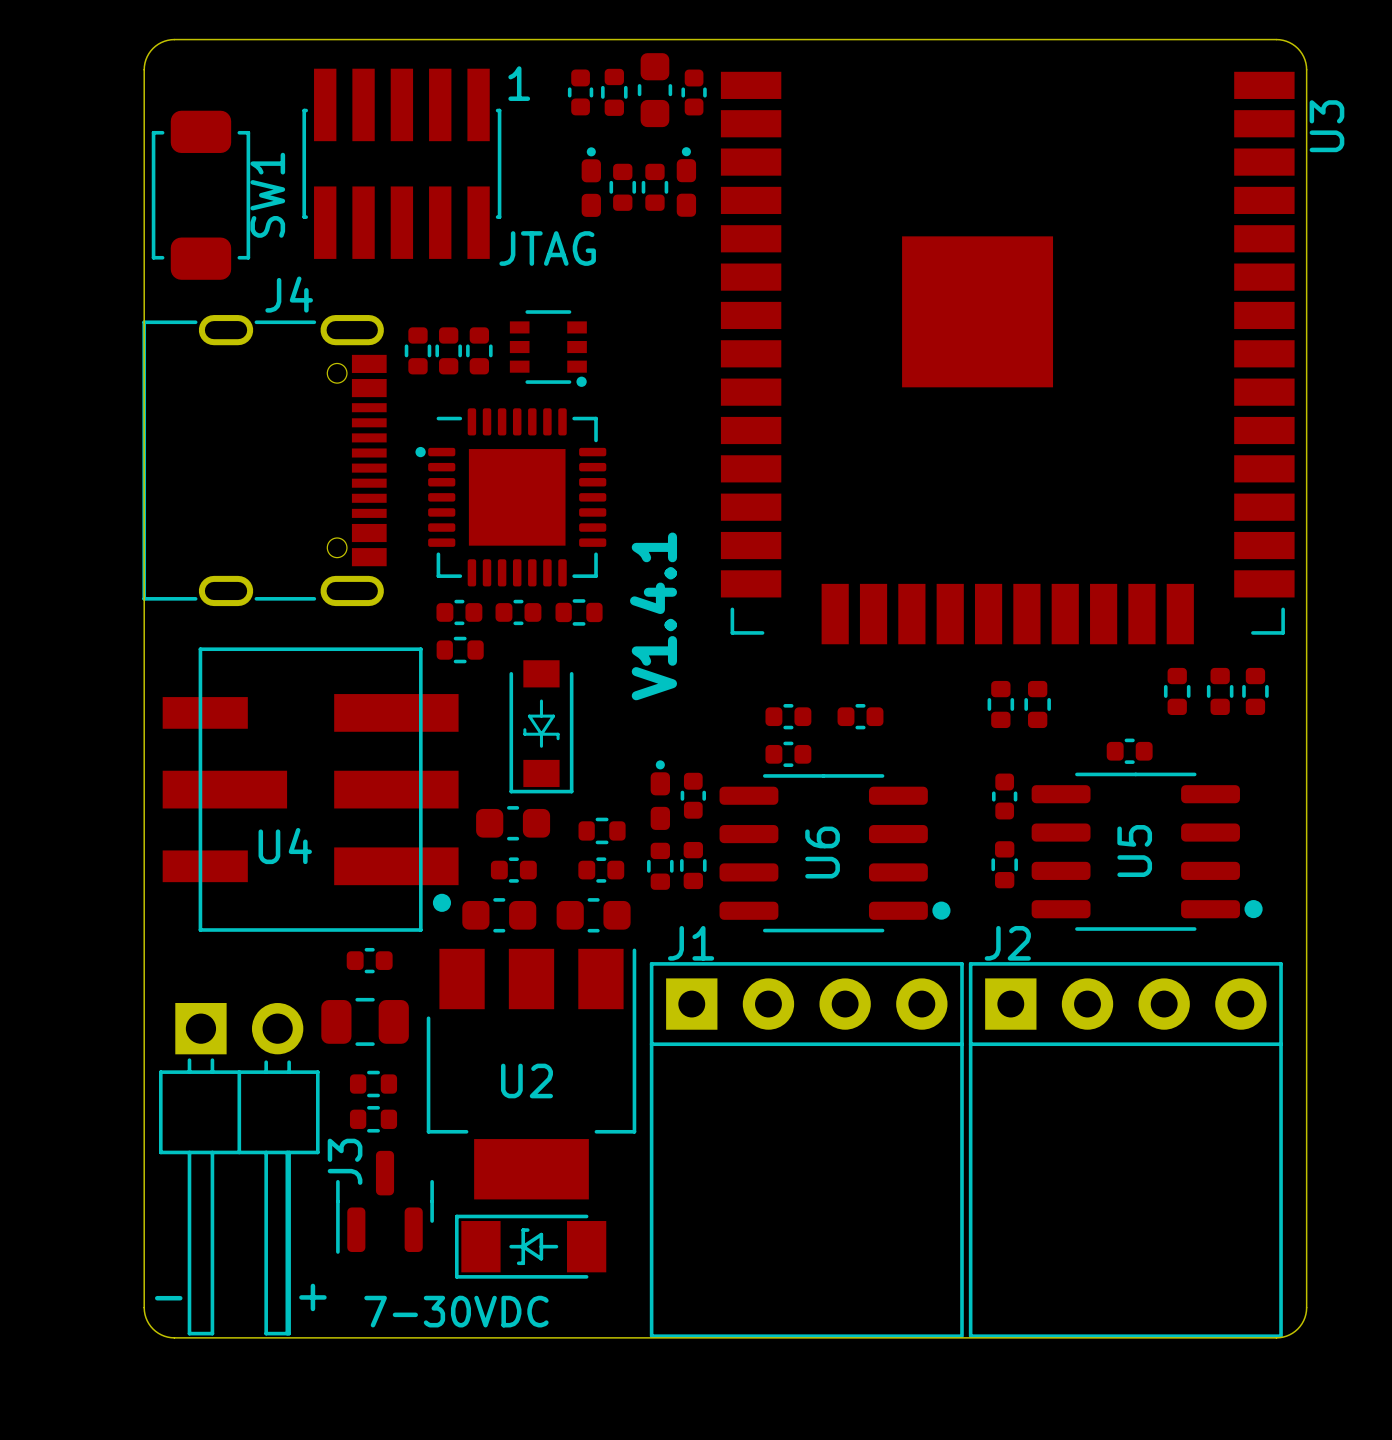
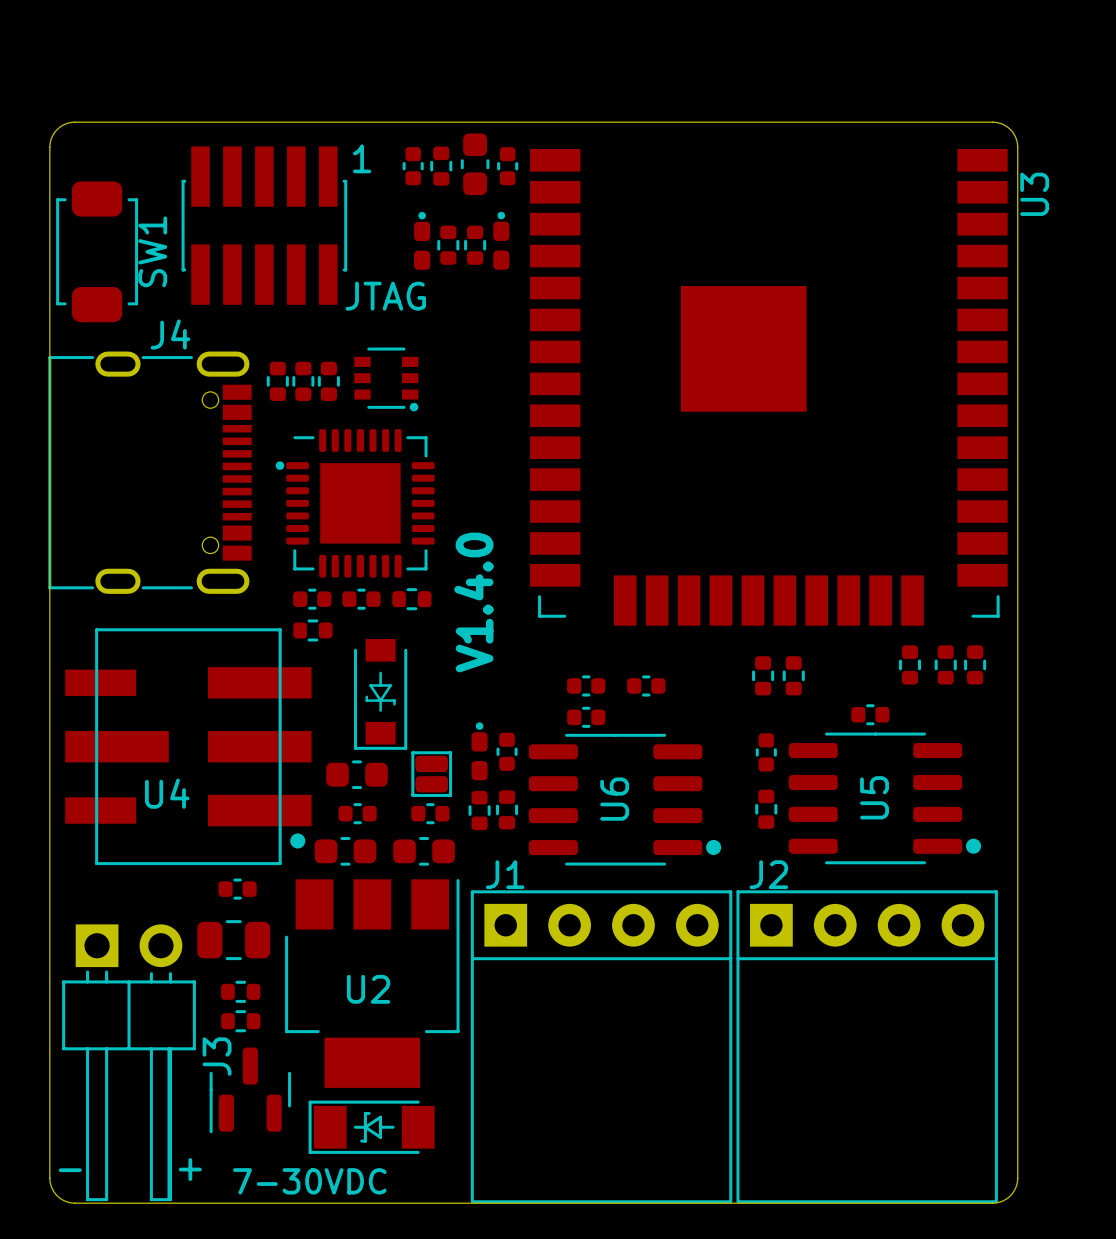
text: V1.4.1 (653, 616) -> V1.4.0 (473, 602)
part footprint: [578, 817, 626, 845] -> [411, 751, 453, 797]

